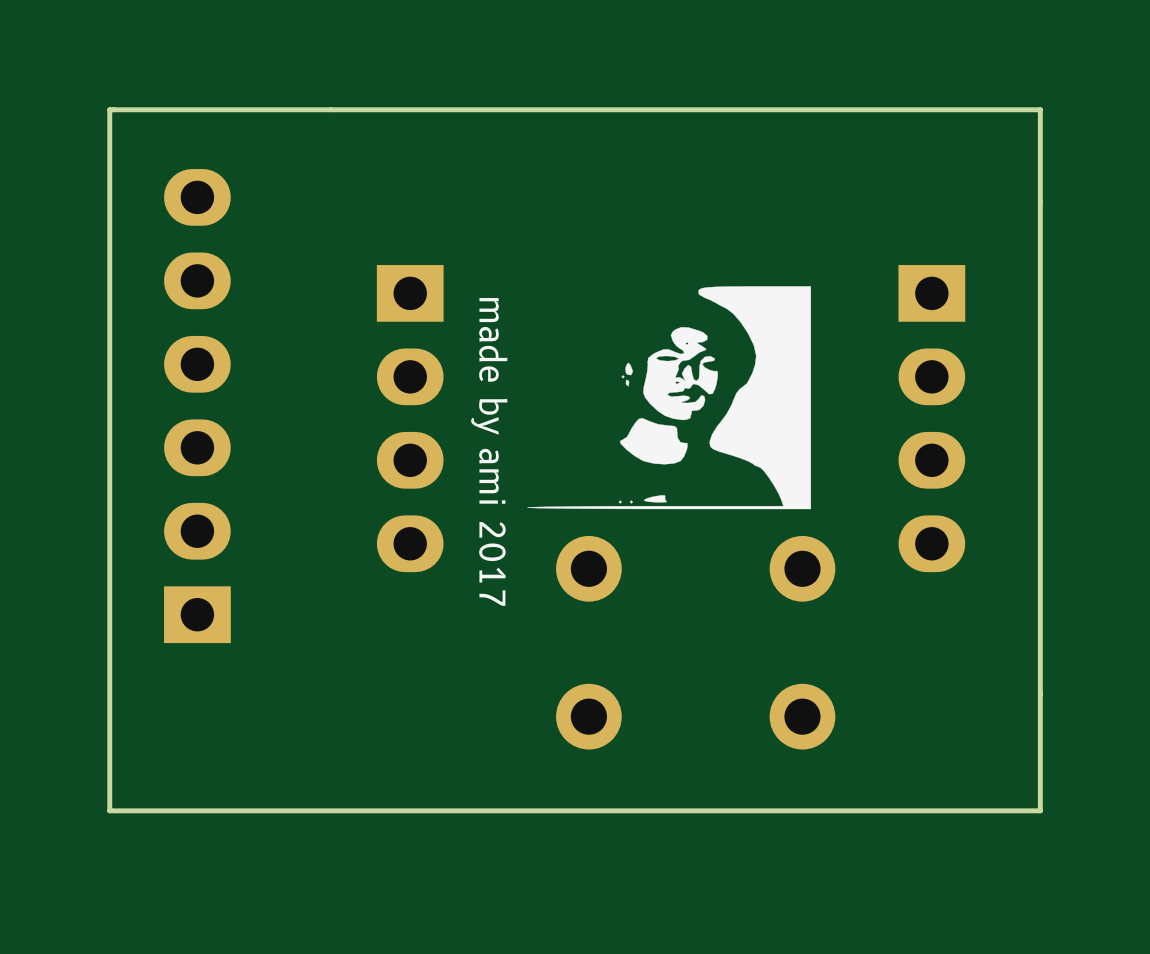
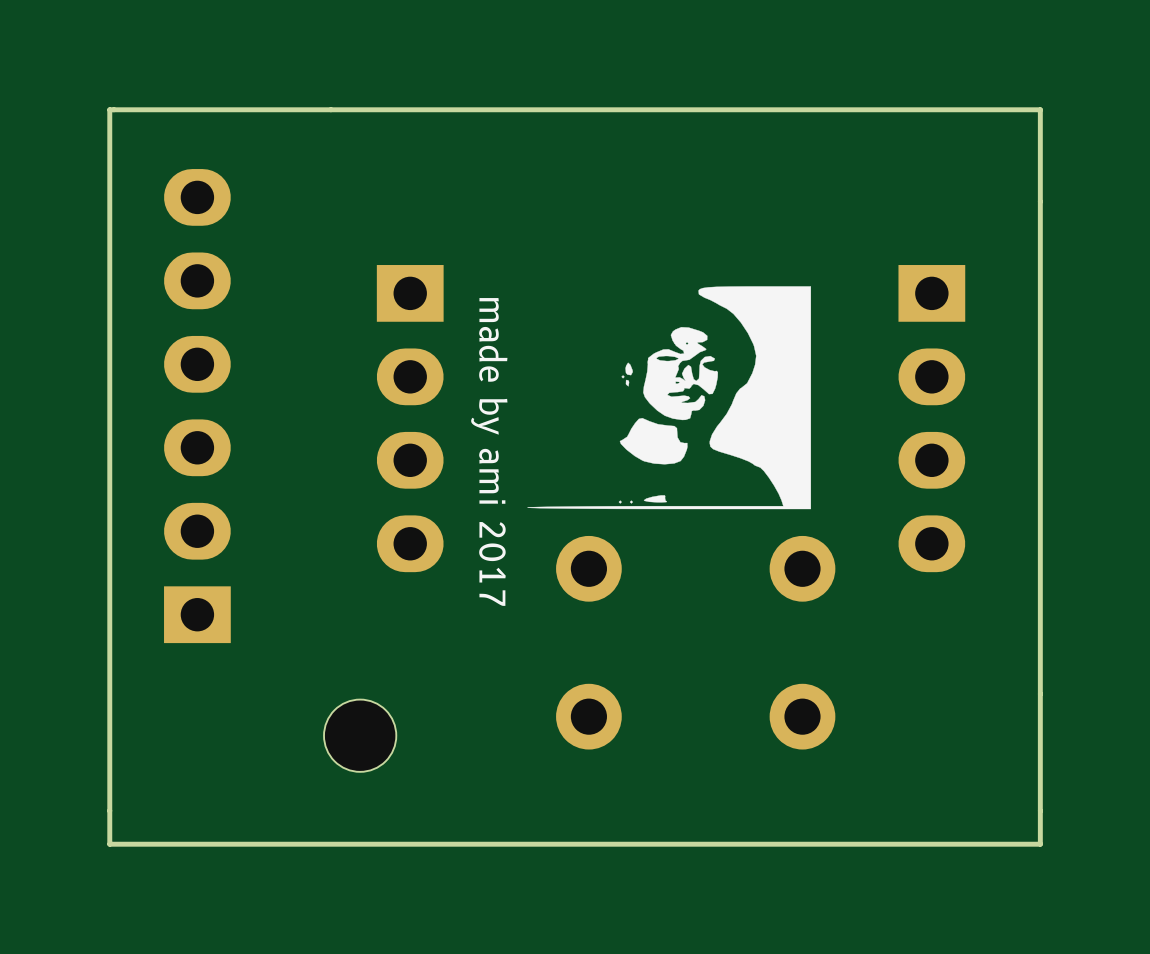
part: none -> (360, 735)
board edge: (1040, 810) (109, 810) -> (1040, 810) (1040, 844) (109, 844) (109, 810)

